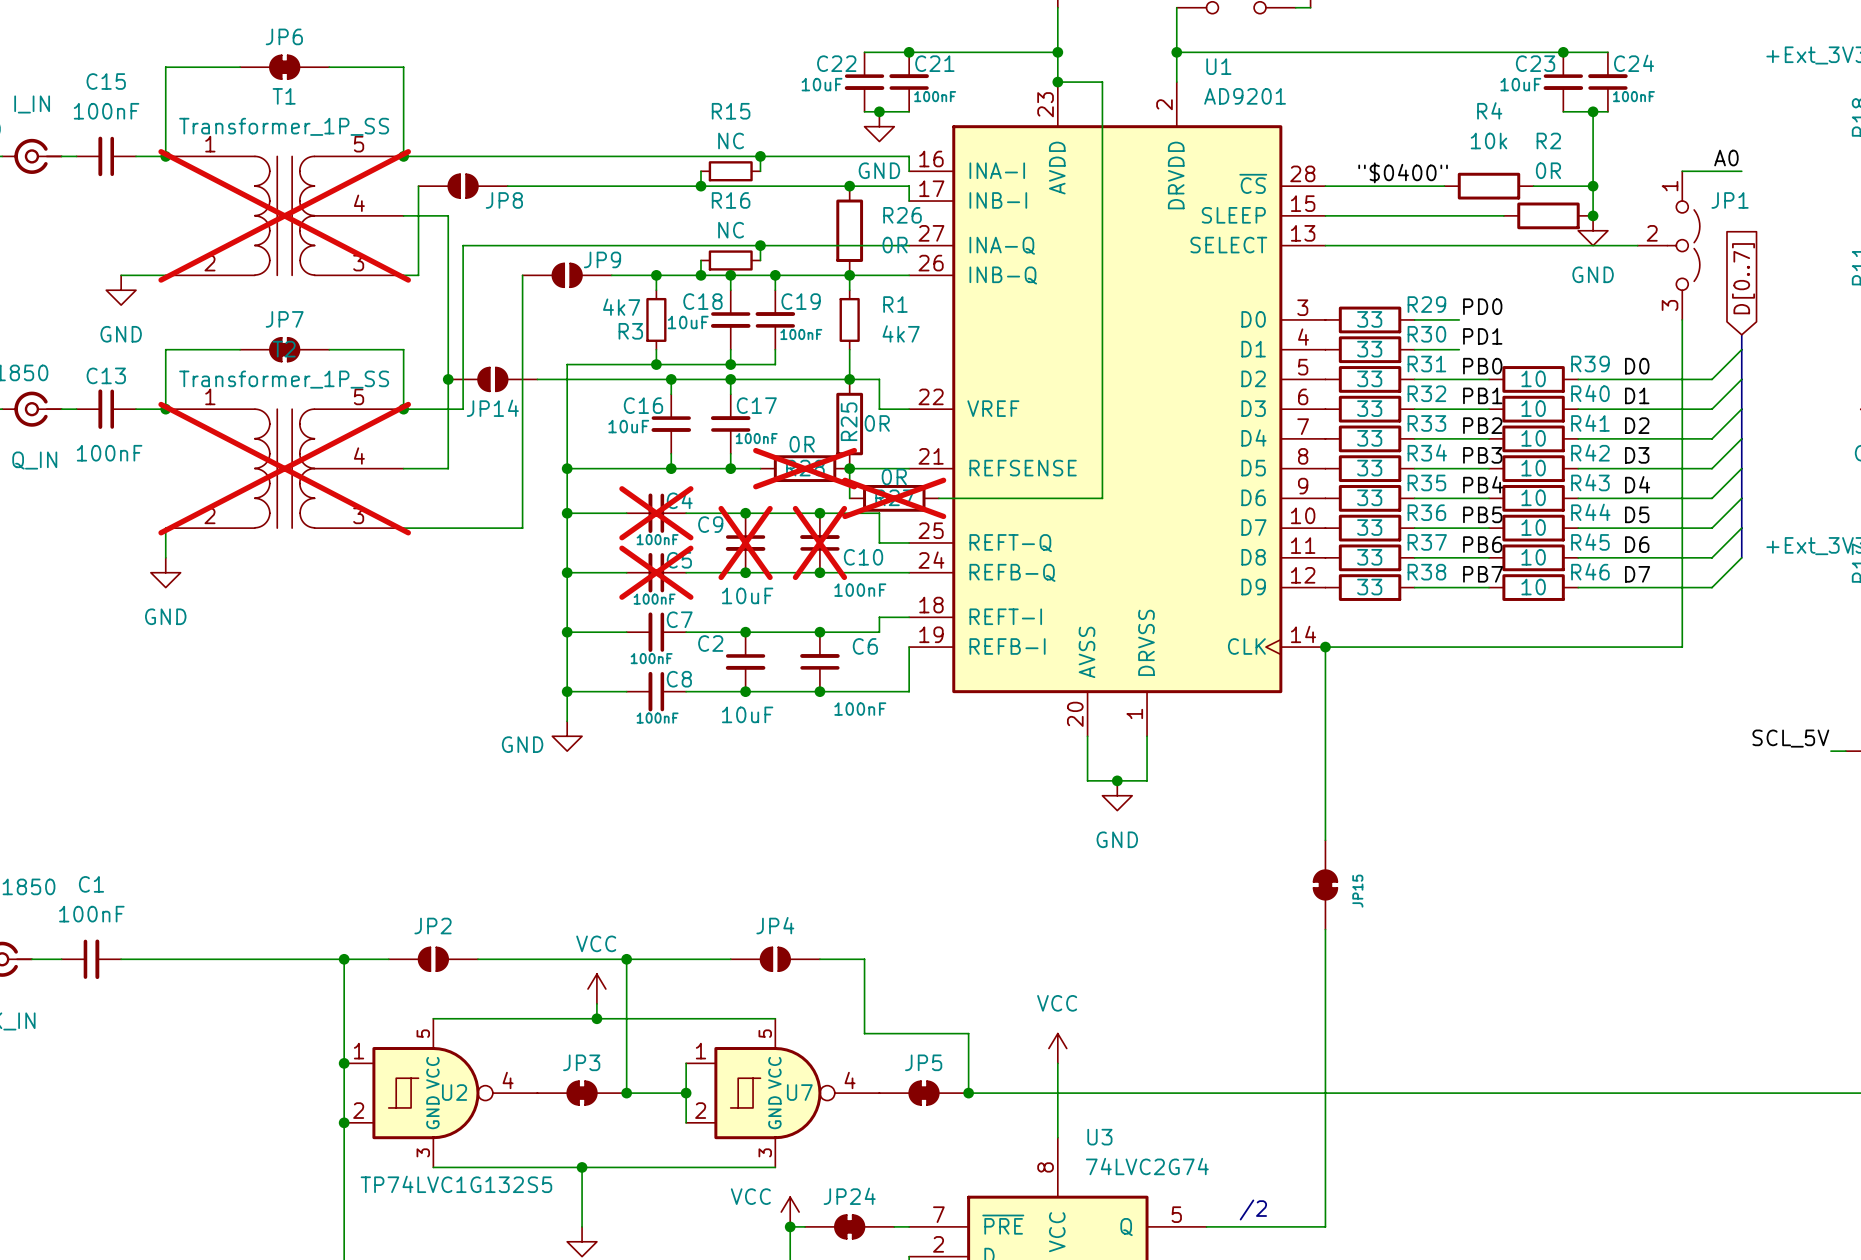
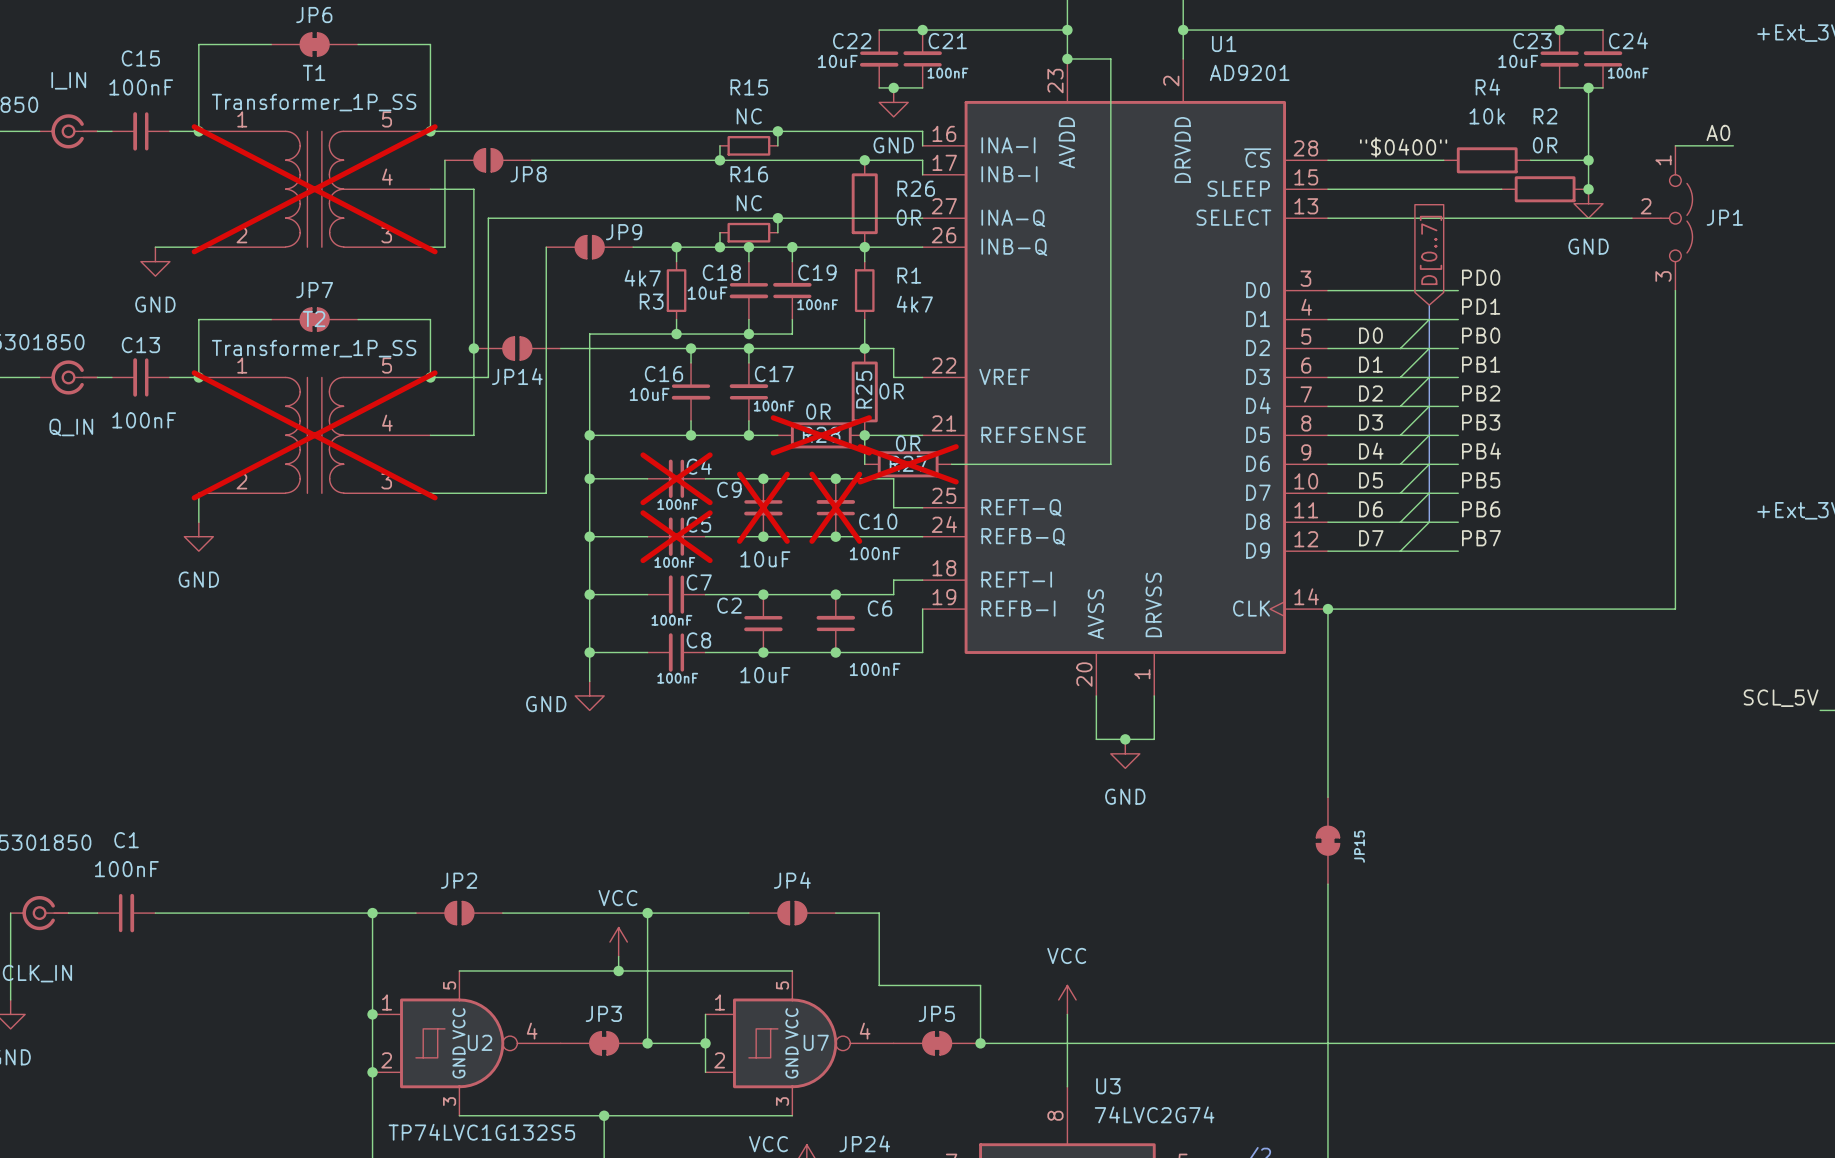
JP1 name position: JP1 (1730, 200) -> JP1 (1724, 217)
global label: none -> D[0..7] (1431, 250)
global label: D[0..7] (1743, 278) -> none
wire: none -> (1327, 290) (1414, 290)
R29: 33 (1370, 319) -> none
bus: none -> (1429, 305) (1429, 522)
bus: (1741, 334) (1741, 557) -> none
wire: none -> (1327, 319) (1414, 319)
R30: 33 (1370, 349) -> none
wire: none -> (1429, 319) (1400, 348)
wire: (1741, 349) (1712, 379) (1578, 379) -> none
label position: D0 (1637, 366) -> D0 (1370, 335)
wire: none -> (1327, 348) (1414, 348)
R31: 33 (1370, 379) -> none
wire: none -> (1429, 348) (1400, 377)
wire: (1459, 379) (1489, 379) -> none
R39: 10 (1533, 379) -> none
wire: (1741, 379) (1712, 409) (1578, 409) -> none
label position: D1 (1637, 395) -> D1 (1370, 364)
wire: none -> (1327, 377) (1414, 377)
R32: 33 (1370, 409) -> none
wire: none -> (1429, 377) (1400, 406)
wire: (1459, 409) (1489, 409) -> none
R40: 10 (1533, 409) -> none
wire: (1741, 409) (1712, 438) (1578, 438) -> none
label position: D2 (1637, 425) -> D2 (1370, 393)
wire: none -> (1327, 406) (1414, 406)
R33: 33 (1370, 438) -> none
wire: none -> (1429, 406) (1400, 435)
wire: (1459, 438) (1489, 438) -> none
R41: 10 (1533, 438) -> none
wire: (1741, 438) (1712, 468) (1578, 468) -> none
label position: D3 (1637, 455) -> D3 (1370, 422)
wire: none -> (1327, 435) (1414, 435)
R34: 33 (1370, 468) -> none
wire: none -> (1429, 435) (1400, 464)
wire: (1459, 468) (1489, 468) -> none
R42: 10 (1533, 468) -> none
wire: (1741, 468) (1712, 498) (1578, 498) -> none
label position: D4 (1637, 484) -> D4 (1371, 451)
wire: none -> (1327, 464) (1414, 464)
R35: 33 (1370, 498) -> none
wire: none -> (1429, 464) (1400, 493)
wire: (1459, 498) (1489, 498) -> none
R43: 10 (1533, 498) -> none
wire: (1741, 498) (1712, 528) (1578, 528) -> none
label position: D5 (1637, 514) -> D5 (1370, 480)
wire: none -> (1327, 493) (1414, 493)
R36: 33 (1370, 528) -> none
wire: none -> (1429, 493) (1400, 522)
wire: (1459, 528) (1489, 528) -> none
R44: 10 (1533, 528) -> none
wire: (1741, 528) (1712, 557) (1578, 557) -> none
label position: D6 (1637, 544) -> D6 (1370, 509)
wire: none -> (1327, 522) (1414, 522)
R37: 33 (1370, 557) -> none
wire: none -> (1429, 522) (1400, 551)
wire: (1459, 557) (1489, 557) -> none
R45: 10 (1533, 557) -> none
wire: (1741, 557) (1712, 587) (1578, 587) -> none
label position: D7 (1637, 574) -> D7 (1371, 538)
wire: none -> (1327, 551) (1414, 551)
R38: 33 (1370, 587) -> none
wire: (1459, 587) (1489, 587) -> none
R46: 10 (1533, 587) -> none

